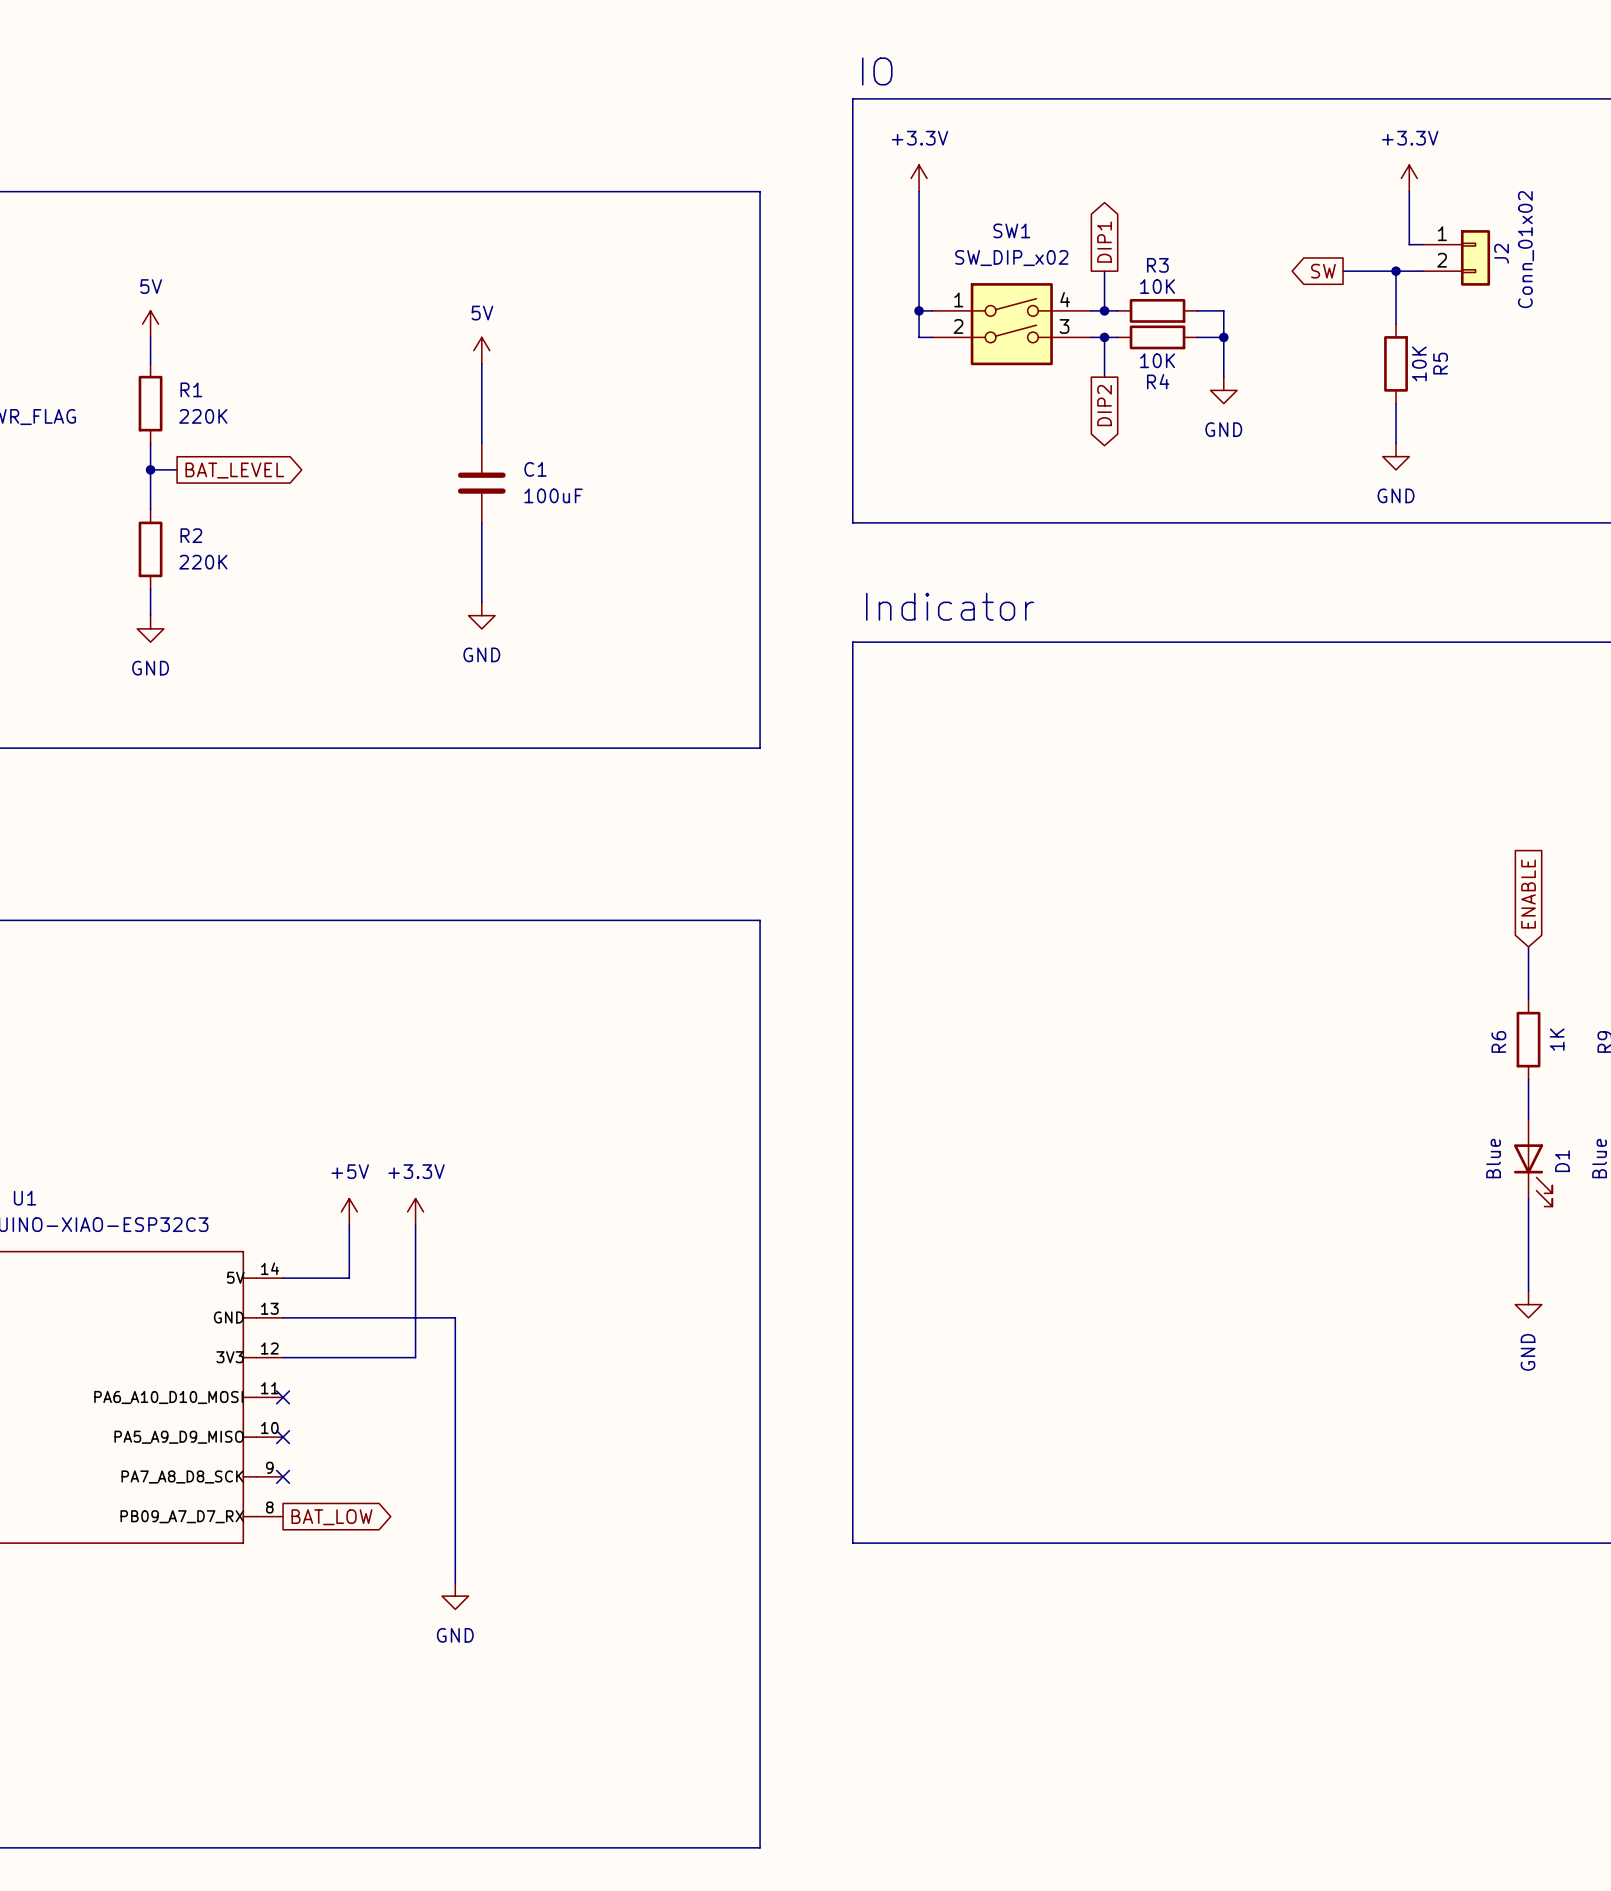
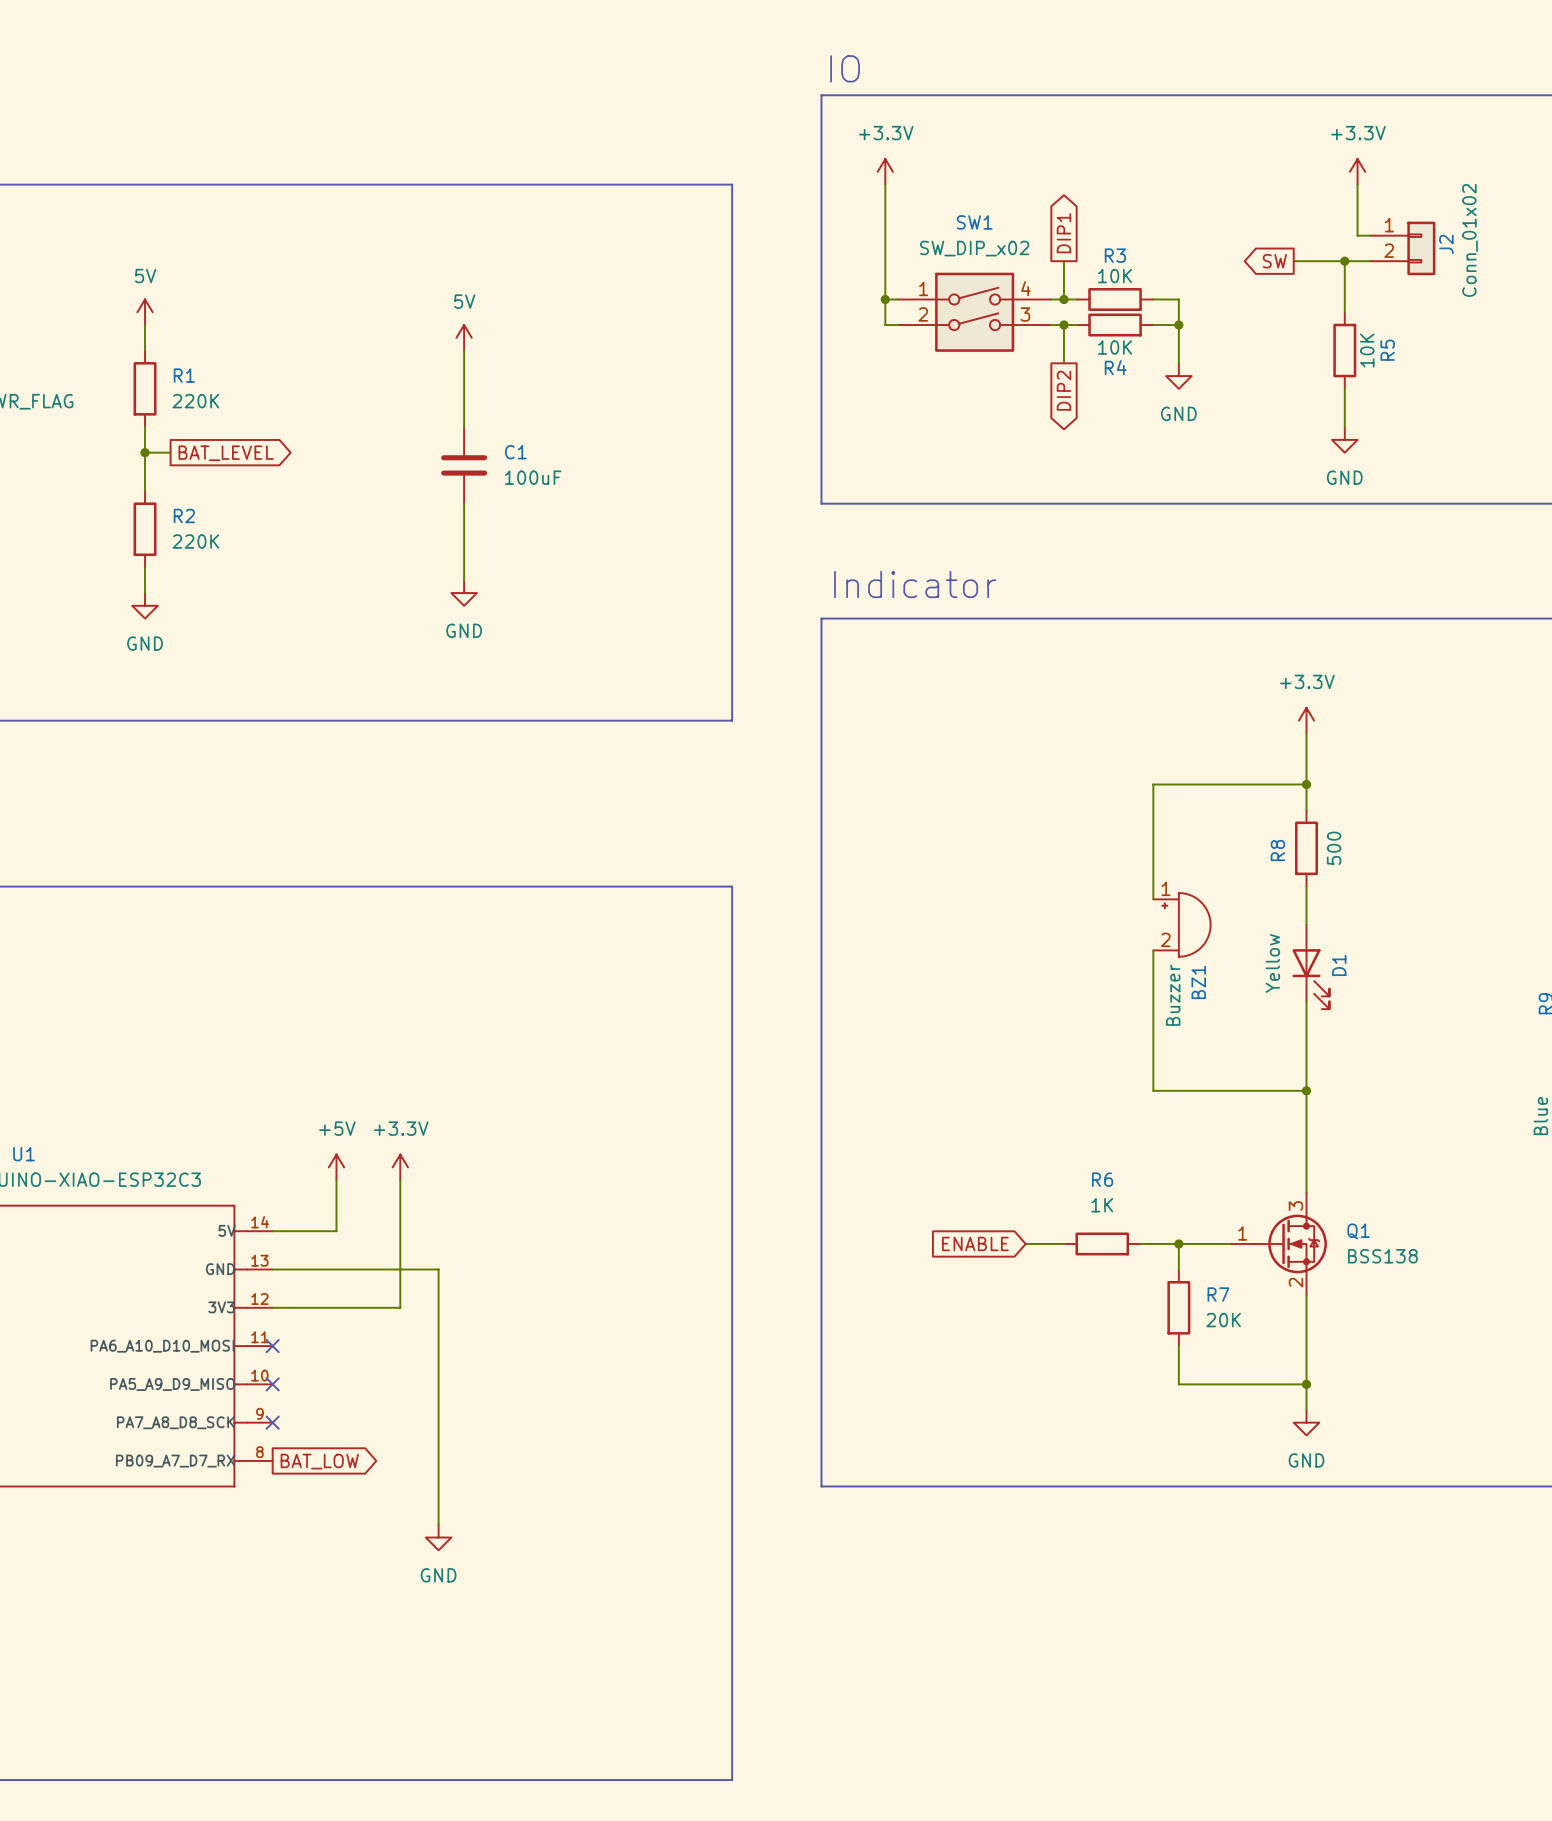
power symbol: none -> +3.3V (1306, 720)
wire: none -> (1306, 733) (1306, 810)
wire: none -> (1306, 784) (1153, 784) (1153, 899)
junction: none -> (1306, 784)
R8: none -> 500 (1306, 848)
global label: ENABLE (1528, 894) -> none
wire: (1528, 946) (1528, 999) -> none
BZ1: none -> Buzzer (1181, 924)
wire: none -> (1153, 950) (1153, 1090) (1306, 1090)
wire: none -> (1306, 1001) (1306, 1192)
R6 rotation: 0° (1528, 1039) -> 90° clockwise (1102, 1243)
R6 position: (1528, 1039) -> (1102, 1243)
R6 value position: 1K (1557, 1039) -> 1K (1102, 1205)
R6 name position: R6 (1498, 1041) -> R6 (1102, 1179)
wire: (1528, 1079) (1528, 1119) -> (1306, 886) (1306, 924)
junction: none -> (1306, 1090)
D1 value: Blue (1493, 1158) -> Yellow (1272, 963)
D1 position: (1533, 1162) -> (1310, 967)
wire: (1528, 1198) (1528, 1291) -> none
global label: none -> ENABLE (975, 1243)
wire: none -> (1025, 1243) (1063, 1243)
wire: none -> (1140, 1243) (1229, 1243)
wire: none -> (1178, 1243) (1178, 1269)
junction: none -> (1178, 1243)
Q1: none -> BSS138 (1278, 1243)
power symbol position: GND (1528, 1304) -> GND (1306, 1422)
wire: none -> (1306, 1295) (1306, 1409)
power symbol text rotation: 0° (1528, 1352) -> 90° clockwise (1306, 1460)
R7: none -> 20K (1178, 1307)
wire: none -> (1178, 1346) (1178, 1384) (1306, 1384)
junction: none -> (1306, 1384)

